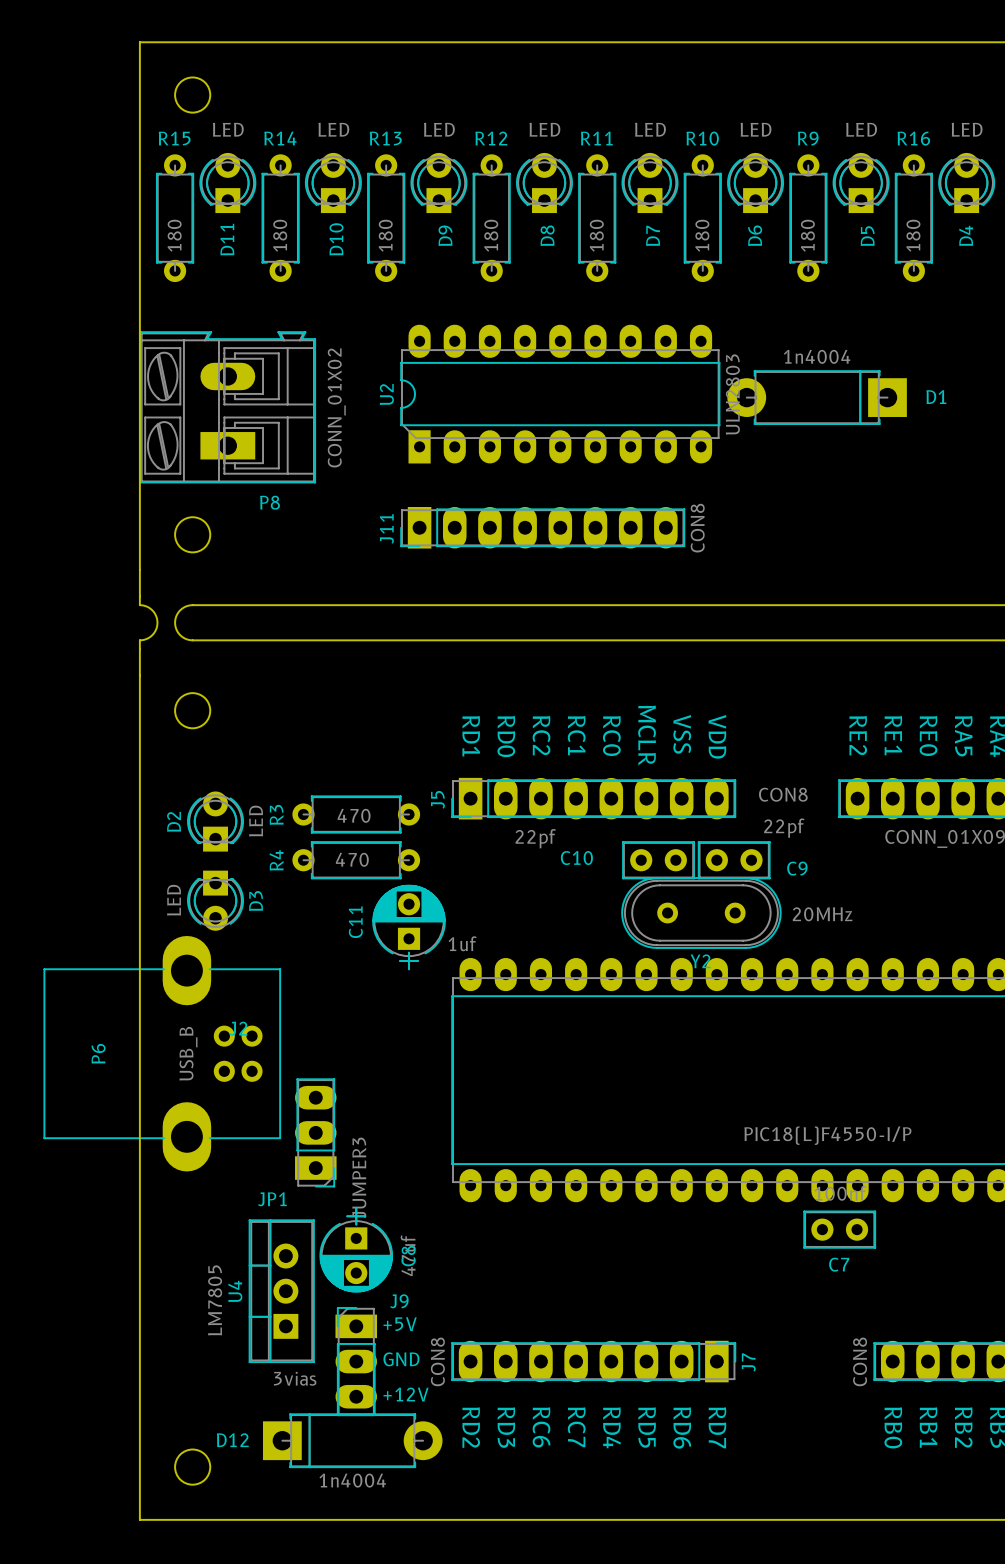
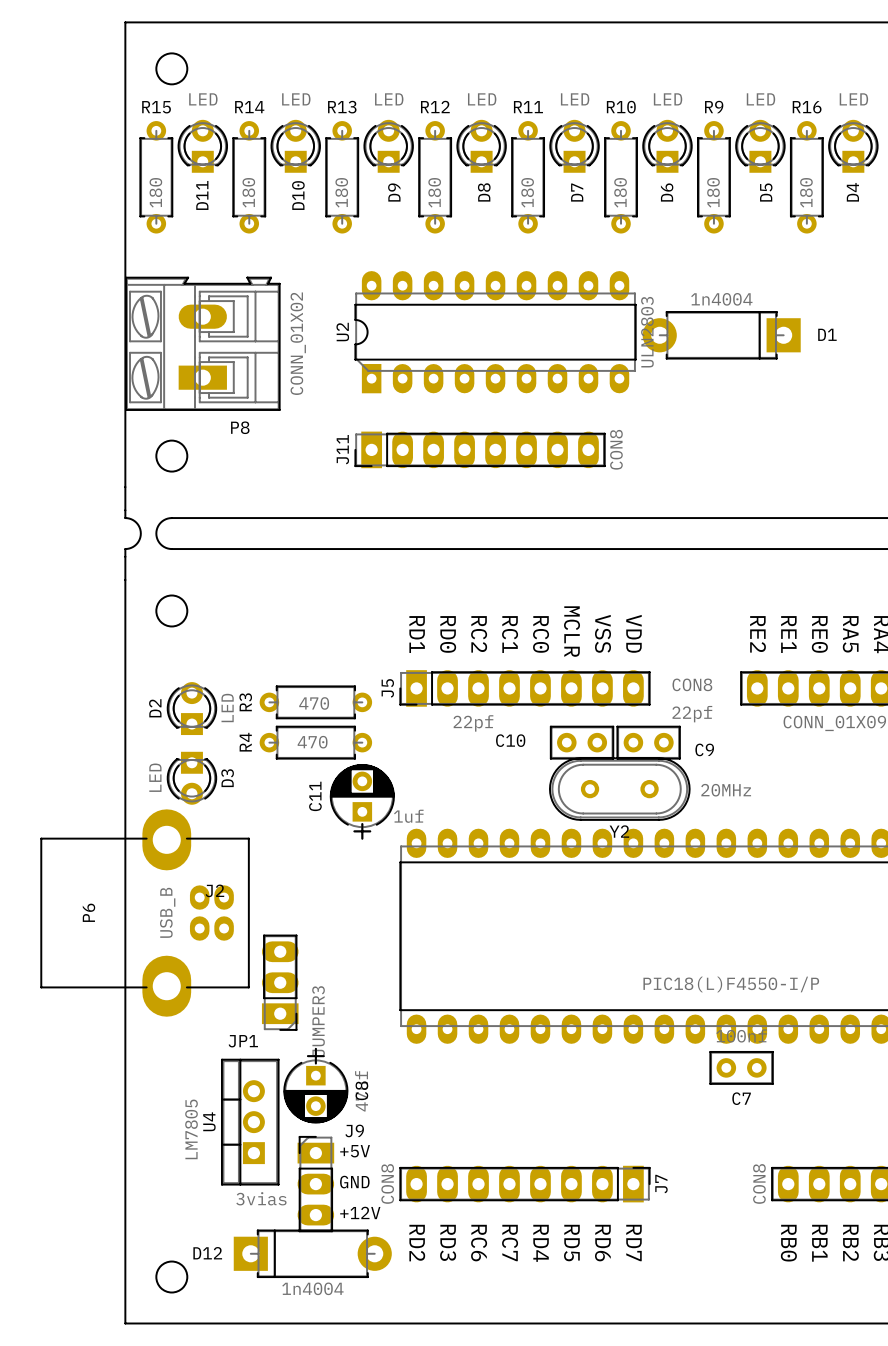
P6 footprint: [43, 935, 281, 1172] -> [40, 809, 250, 1017]

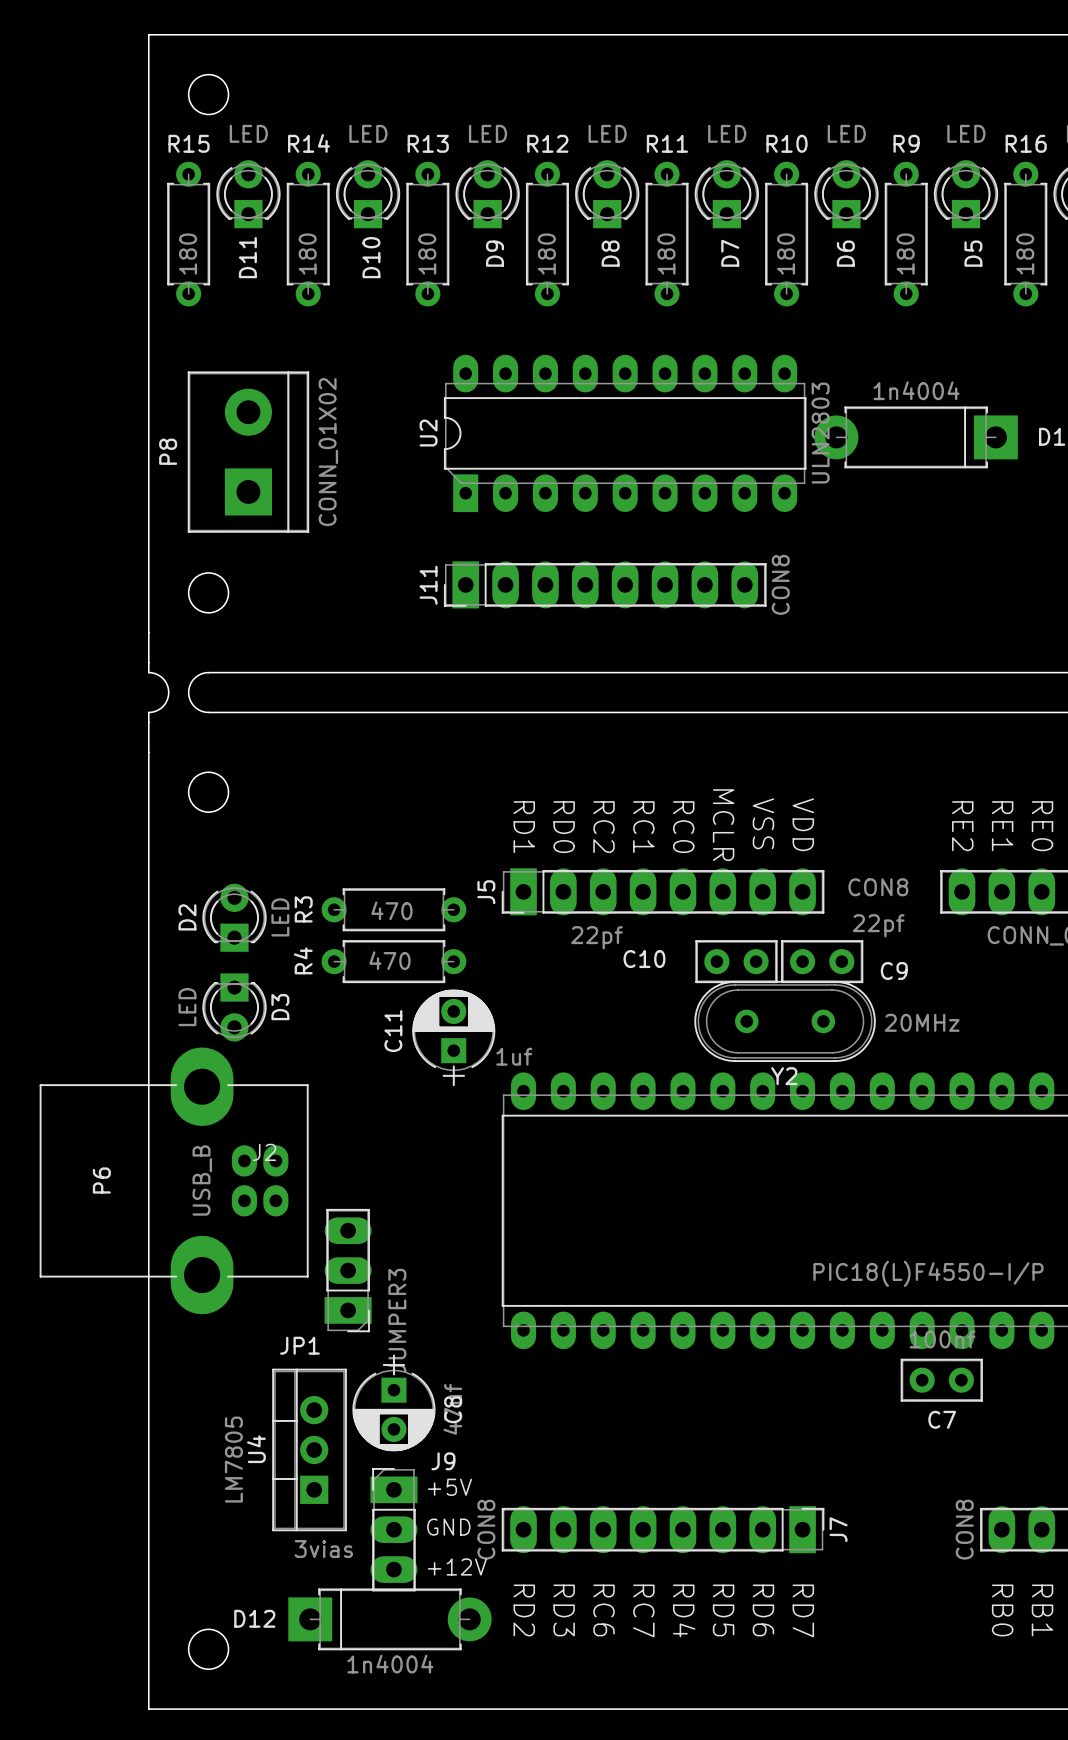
P8 footprint: [125, 276, 281, 411] -> [187, 371, 310, 533]
P8 value position: CONN_01X02 (298, 343) -> CONN_01X02 (328, 452)
P8 name position: P8 (240, 427) -> P8 (168, 451)

